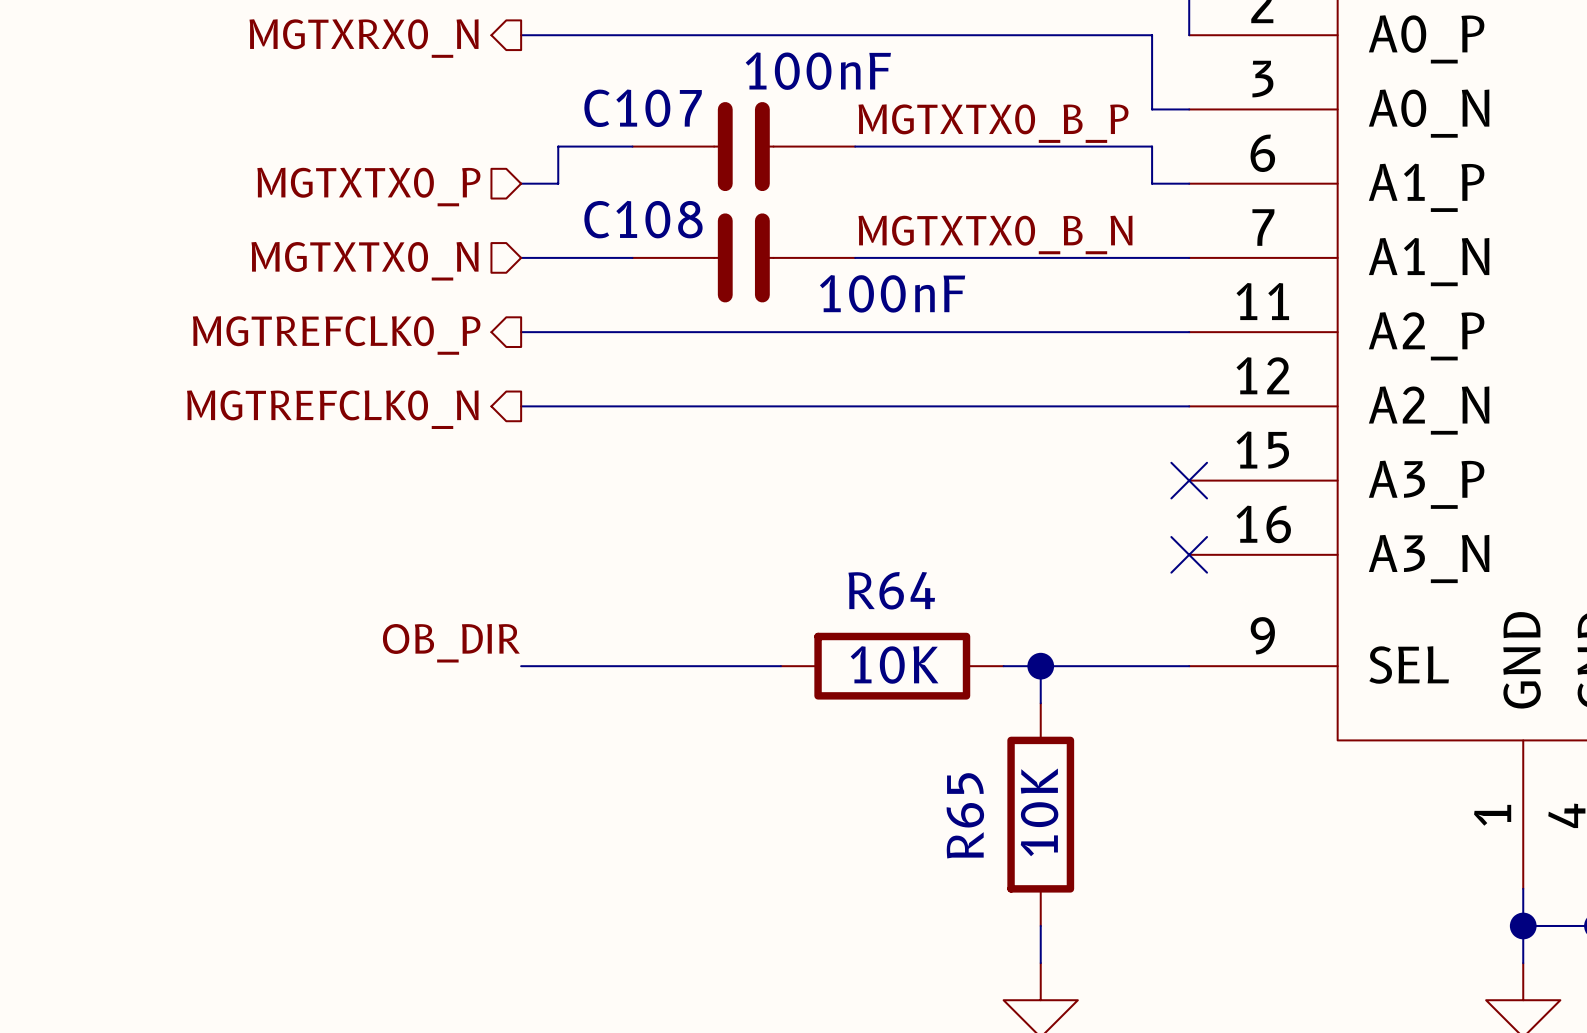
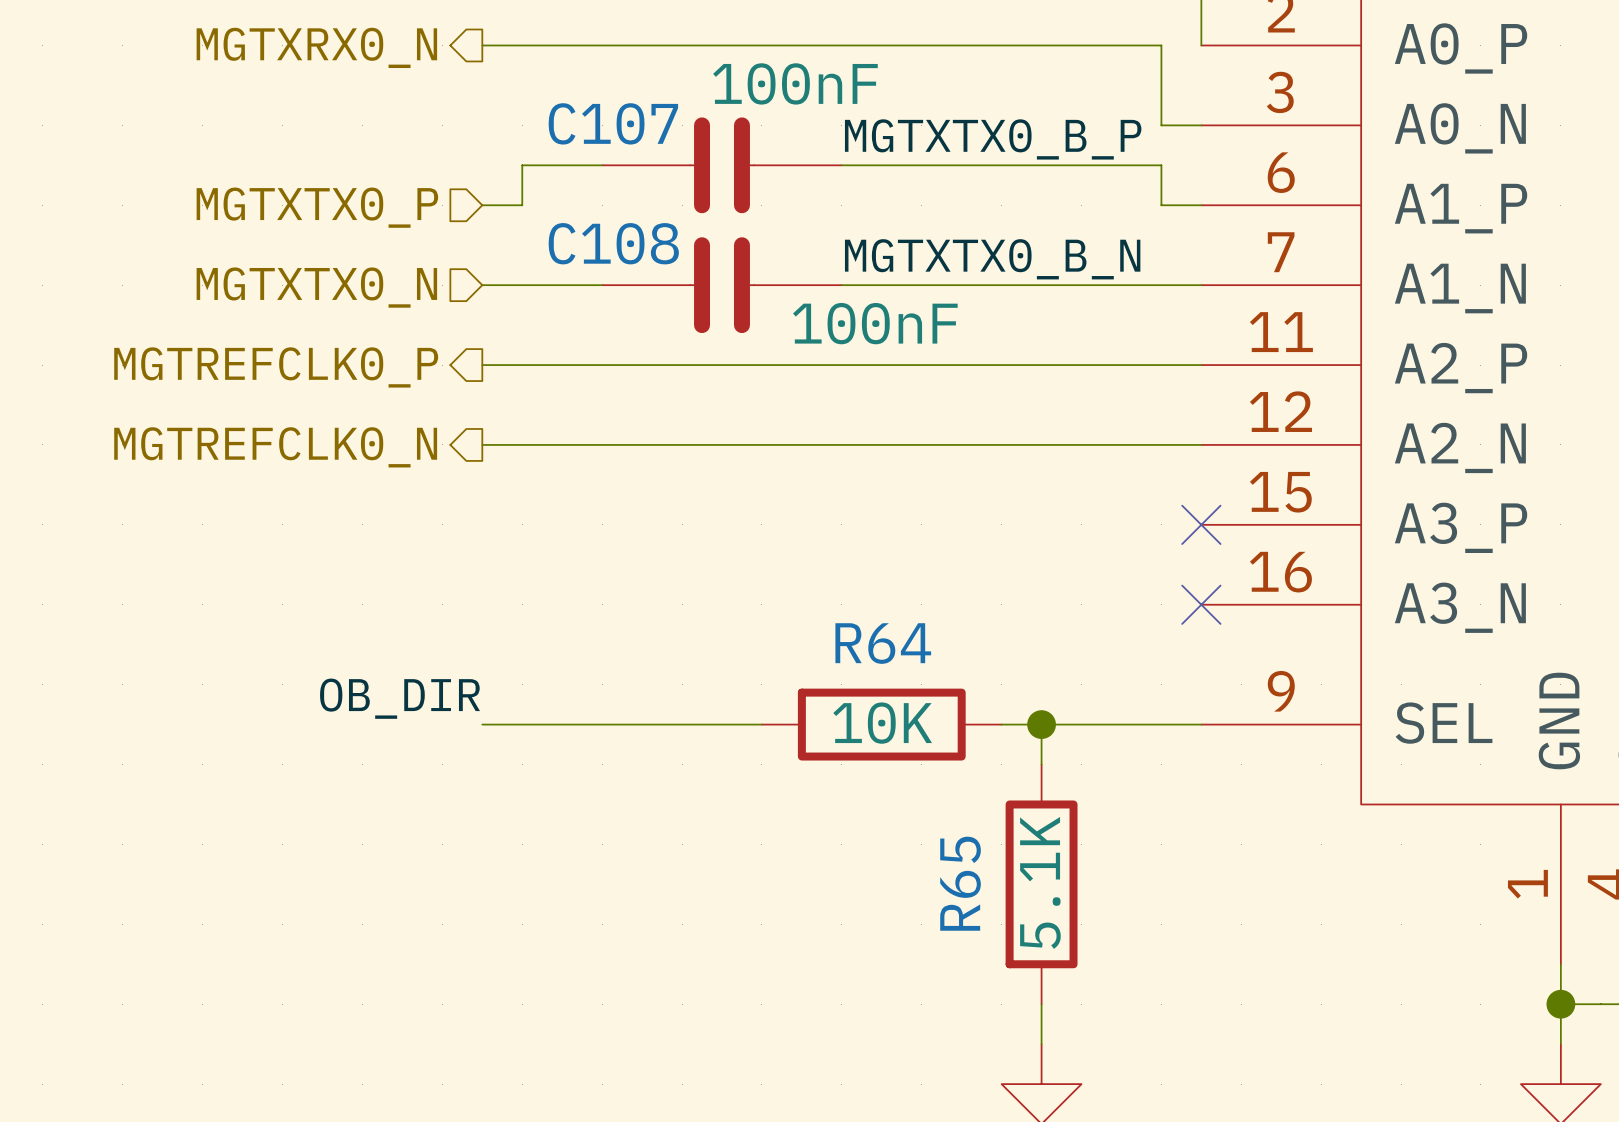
R65 value: 10K (1039, 812) -> 5.1K (1040, 882)

